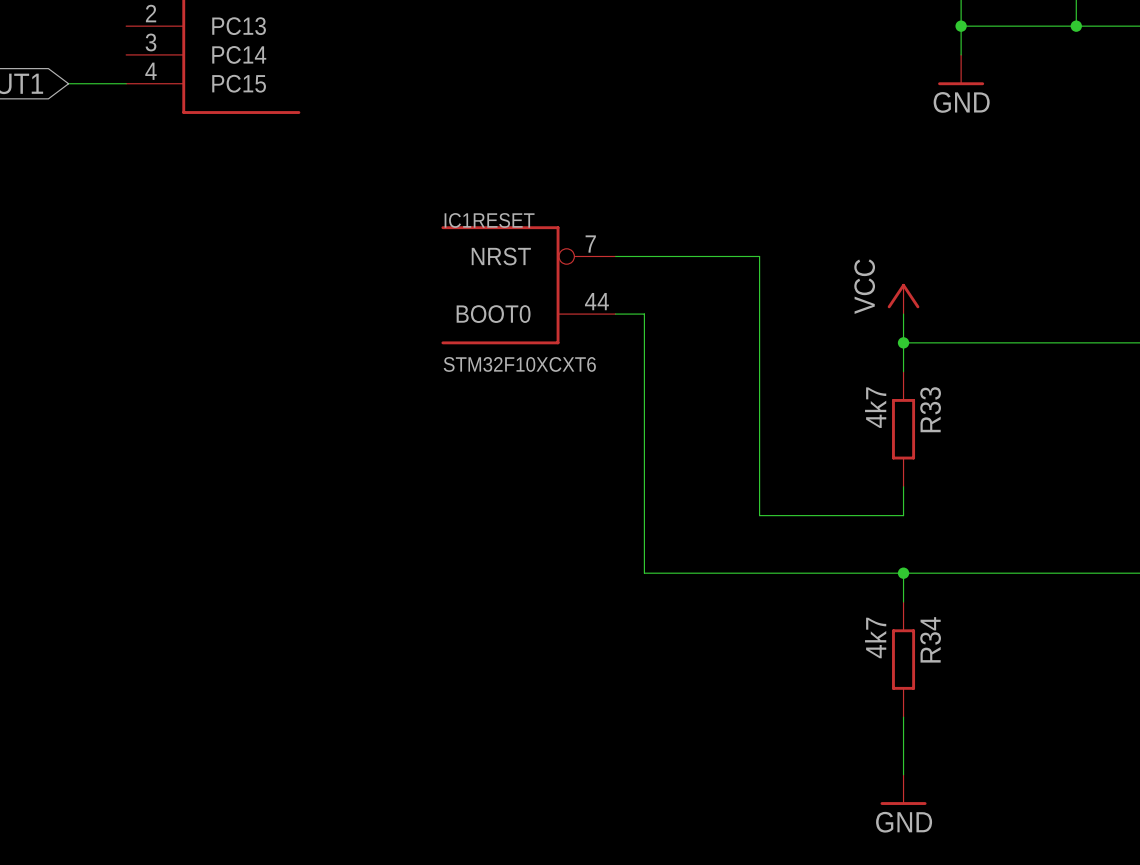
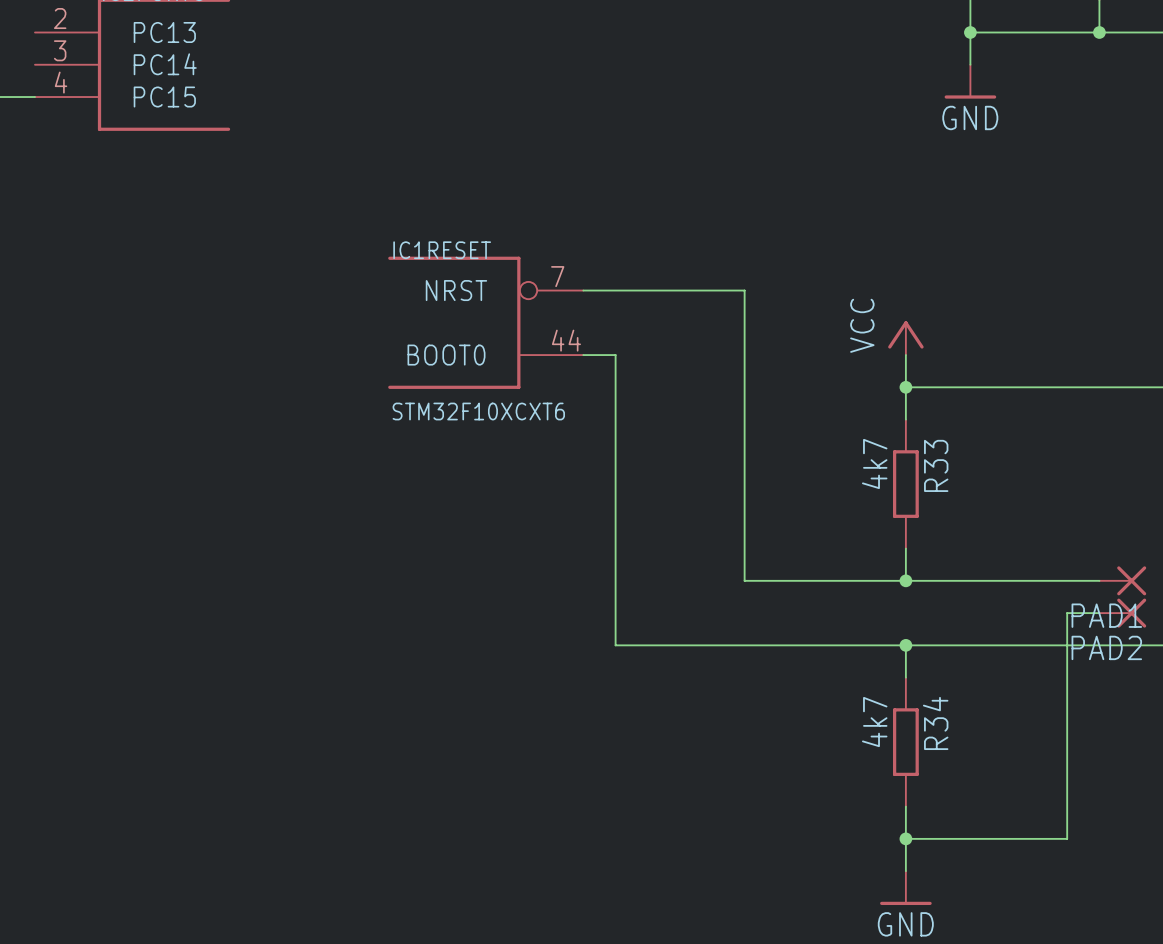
wire: none -> (905, 580) (1099, 580)
junction: none -> (905, 580)
PAD1: none -> (1122, 580)
wire: none -> (1099, 613) (1067, 613) (1067, 838) (905, 838)
PAD2: none -> (1122, 613)
junction: none -> (905, 838)

